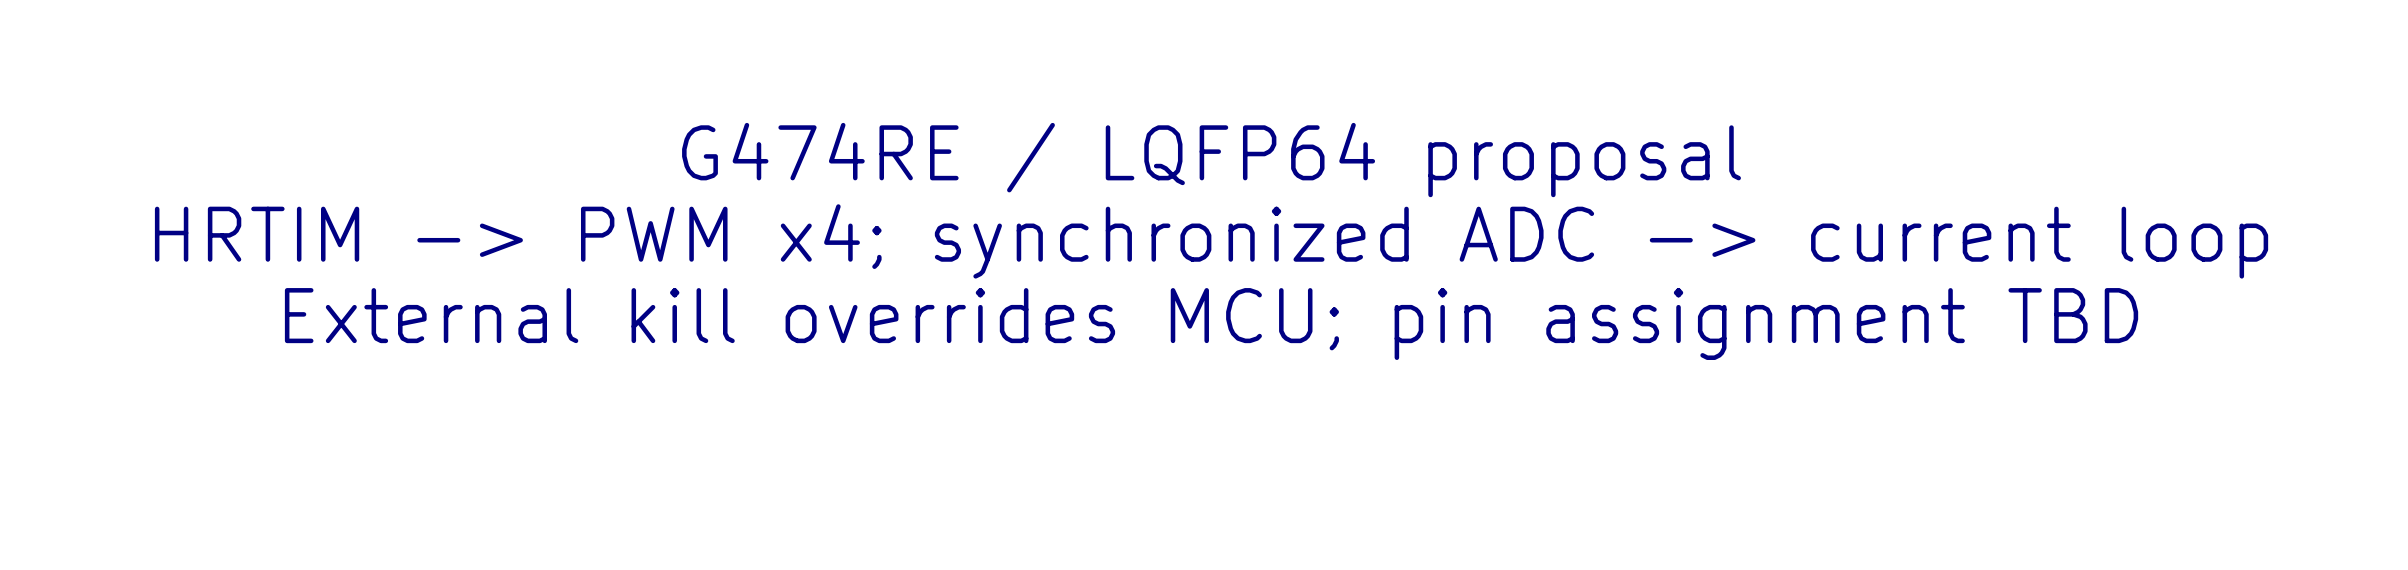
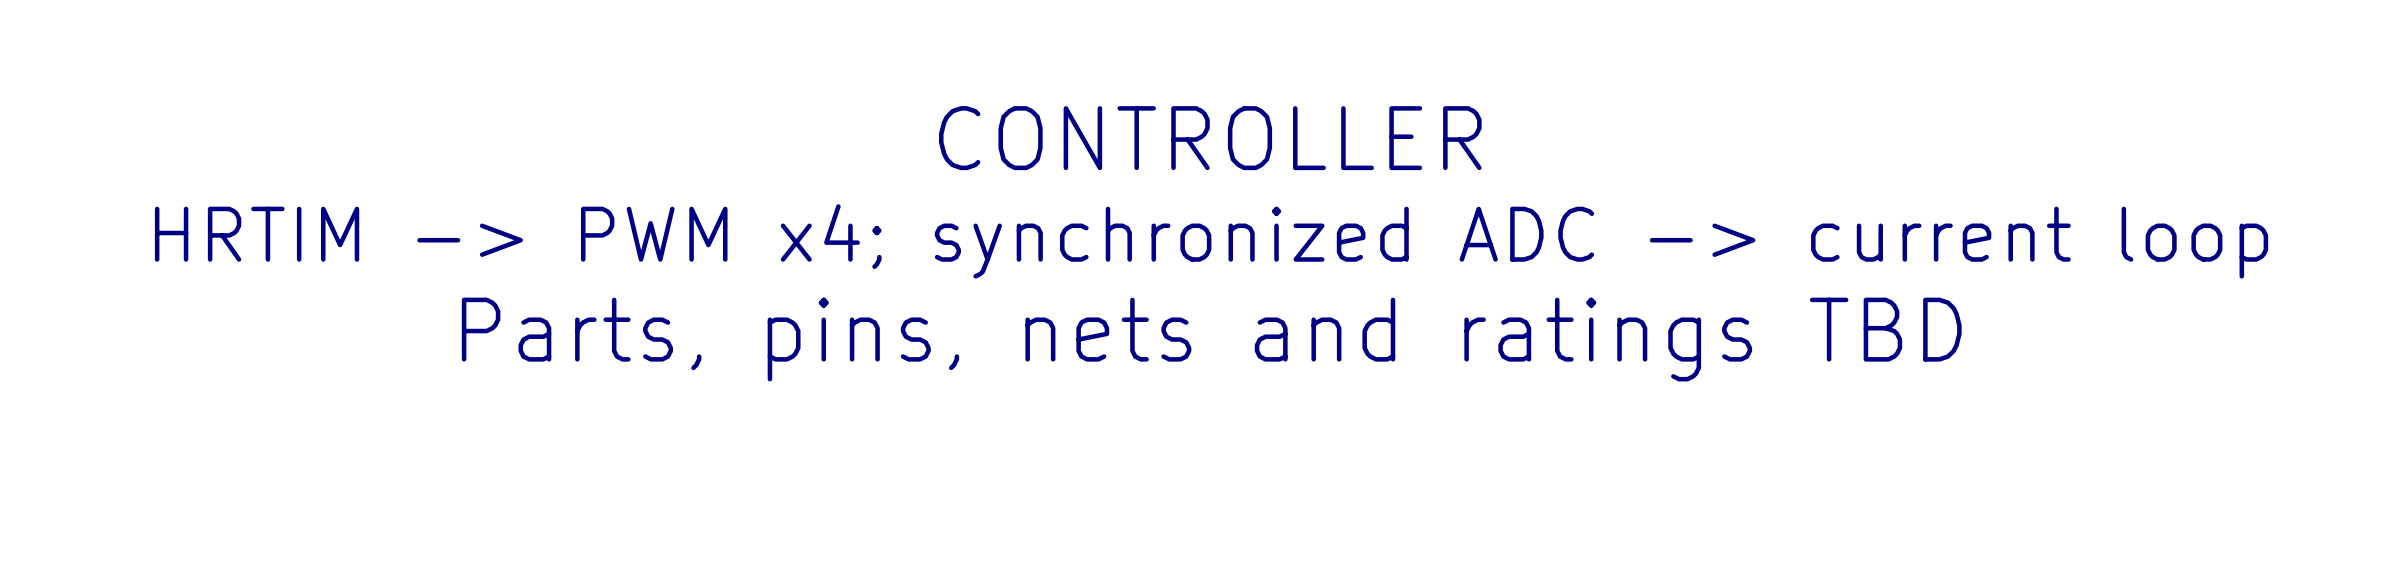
text: G474RE / LQFP64 proposal (1211, 160) -> CONTROLLER (1210, 138)
text: External kill overrides MCU; pin assignment TBD (1211, 324) -> Parts, pins, nets and ratings TBD (1211, 339)

